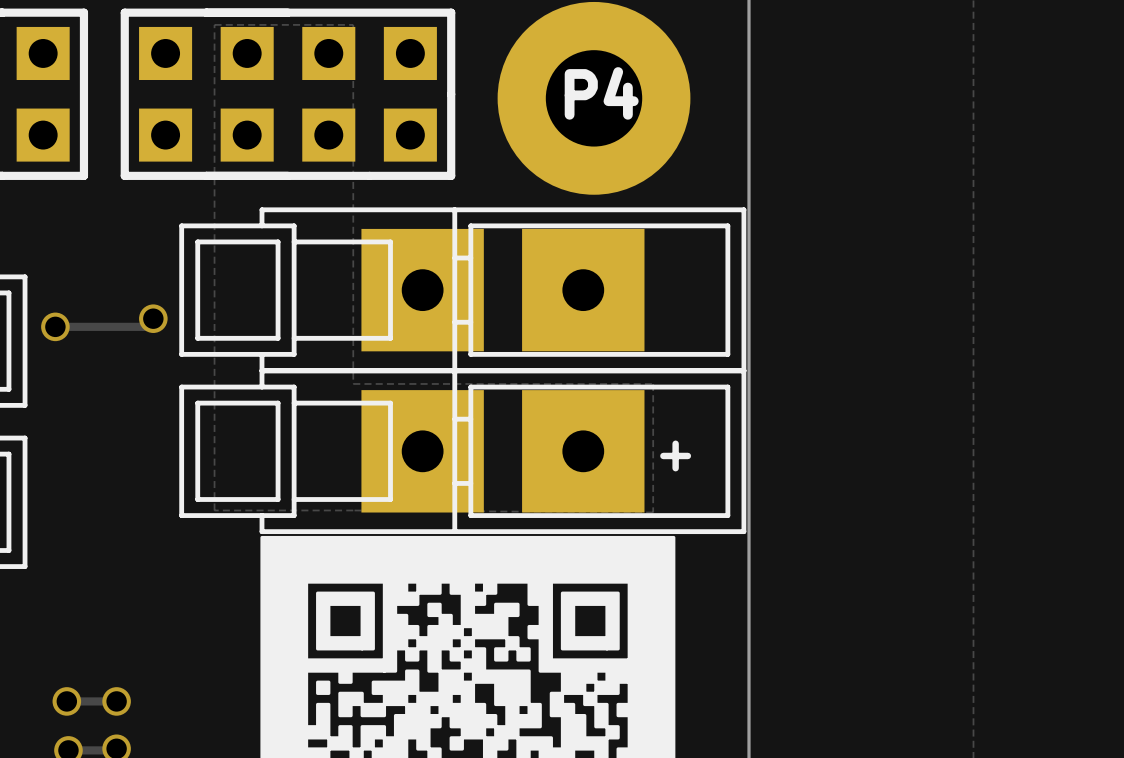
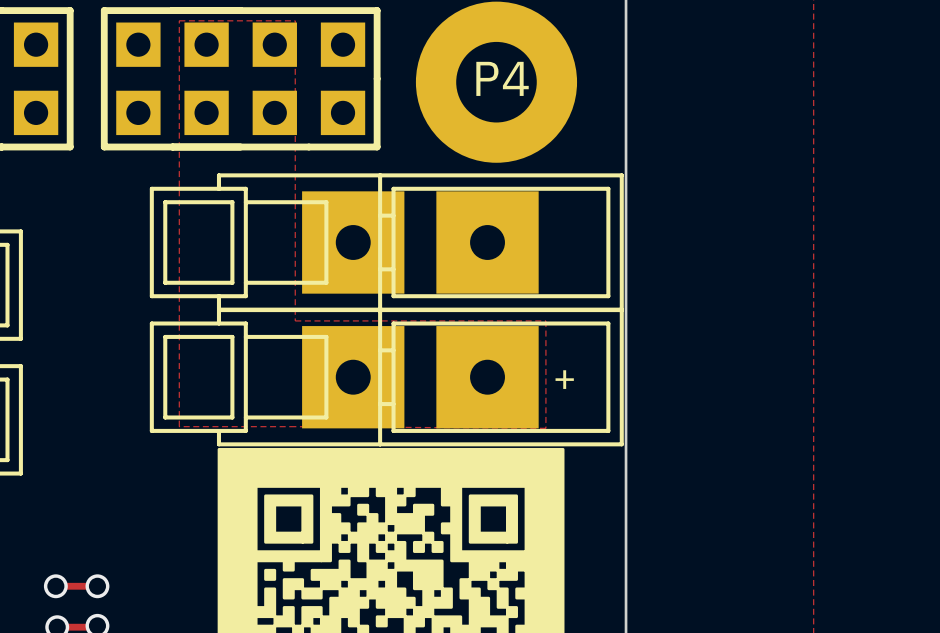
track: (153, 318) (145, 326) (55, 326) -> none
via: (153, 318) -> none
via: (55, 326) -> none

